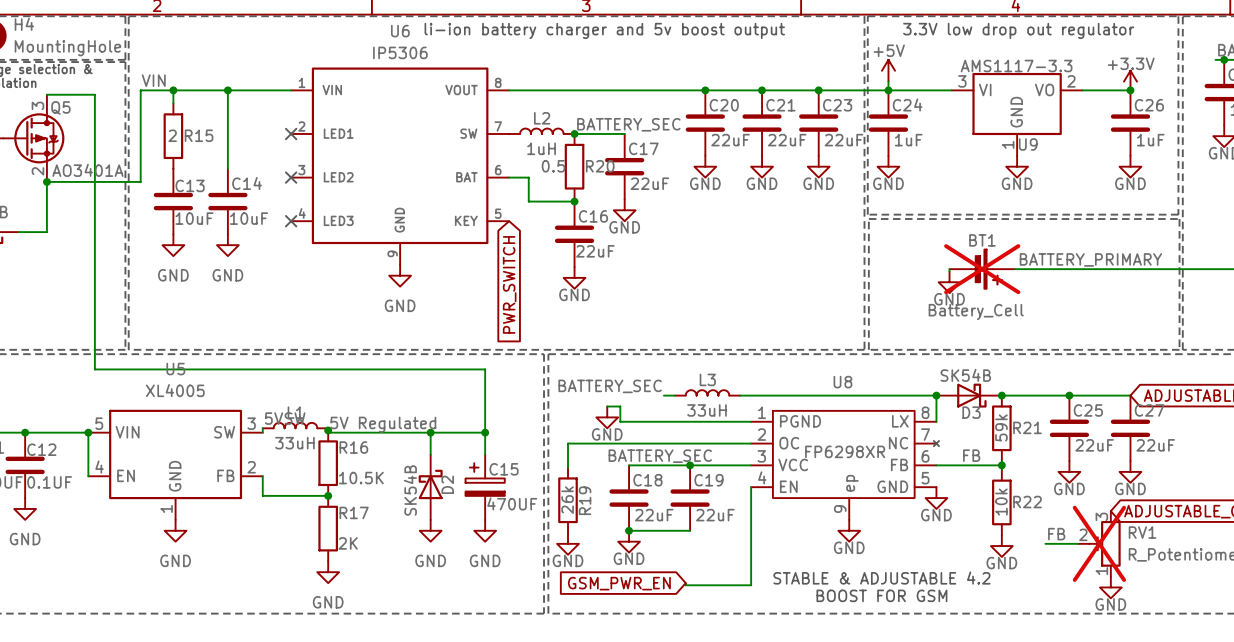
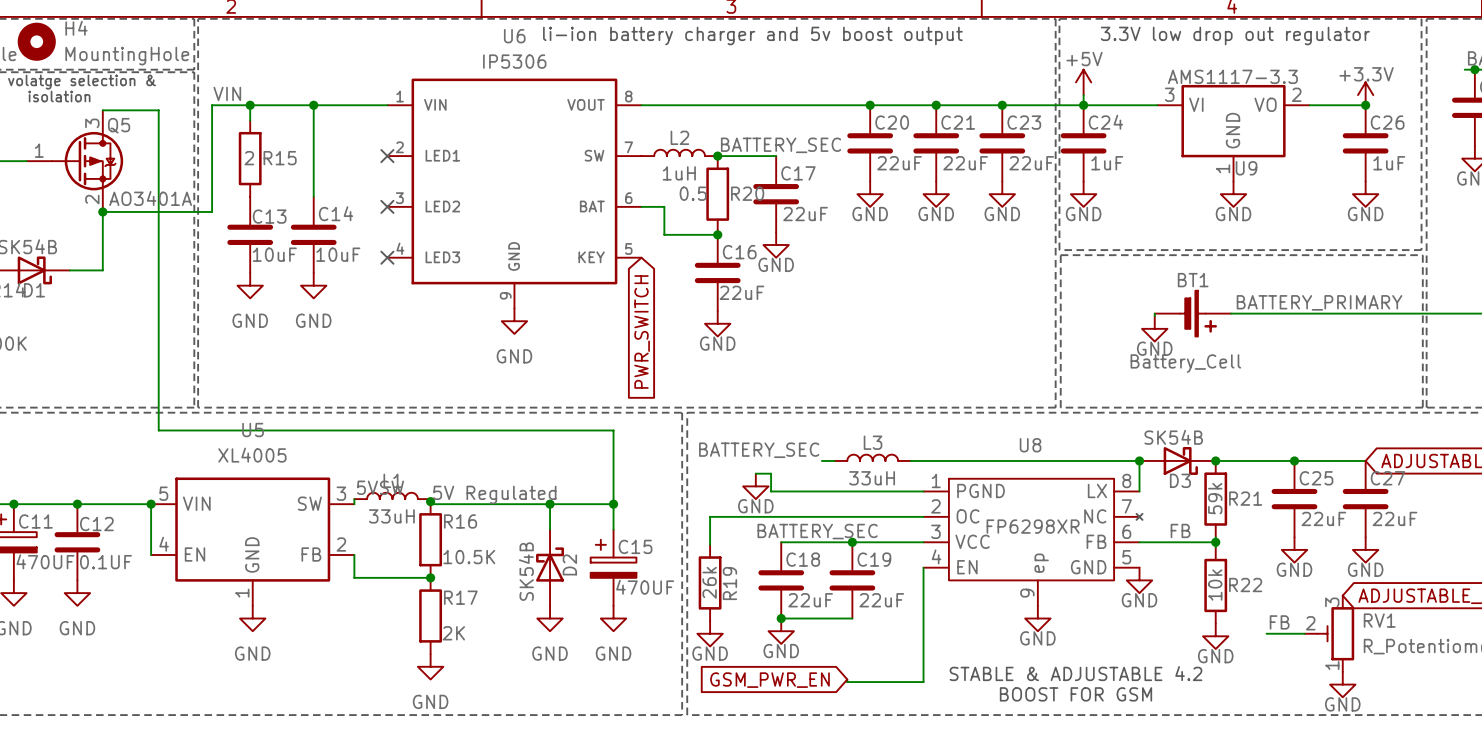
BT1 do-not-place cross: (982, 269) -> none
RV1 do-not-place cross: (1099, 543) -> none

